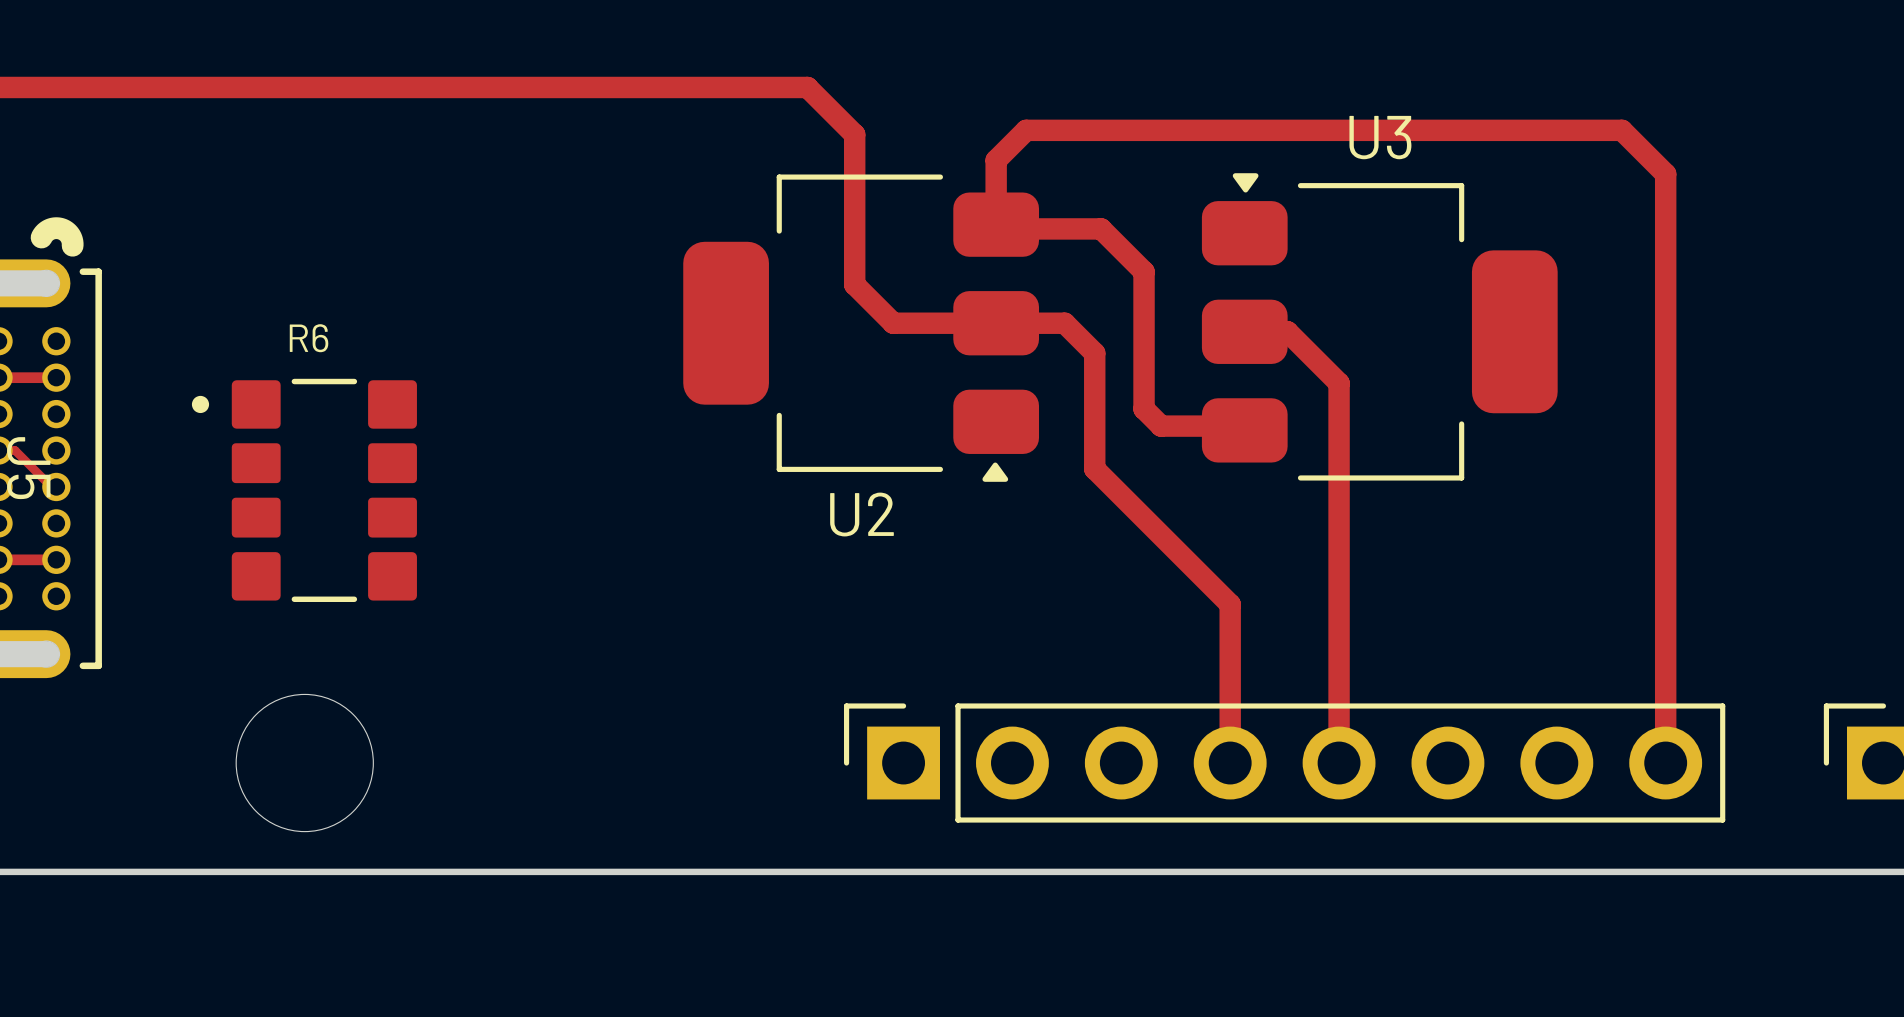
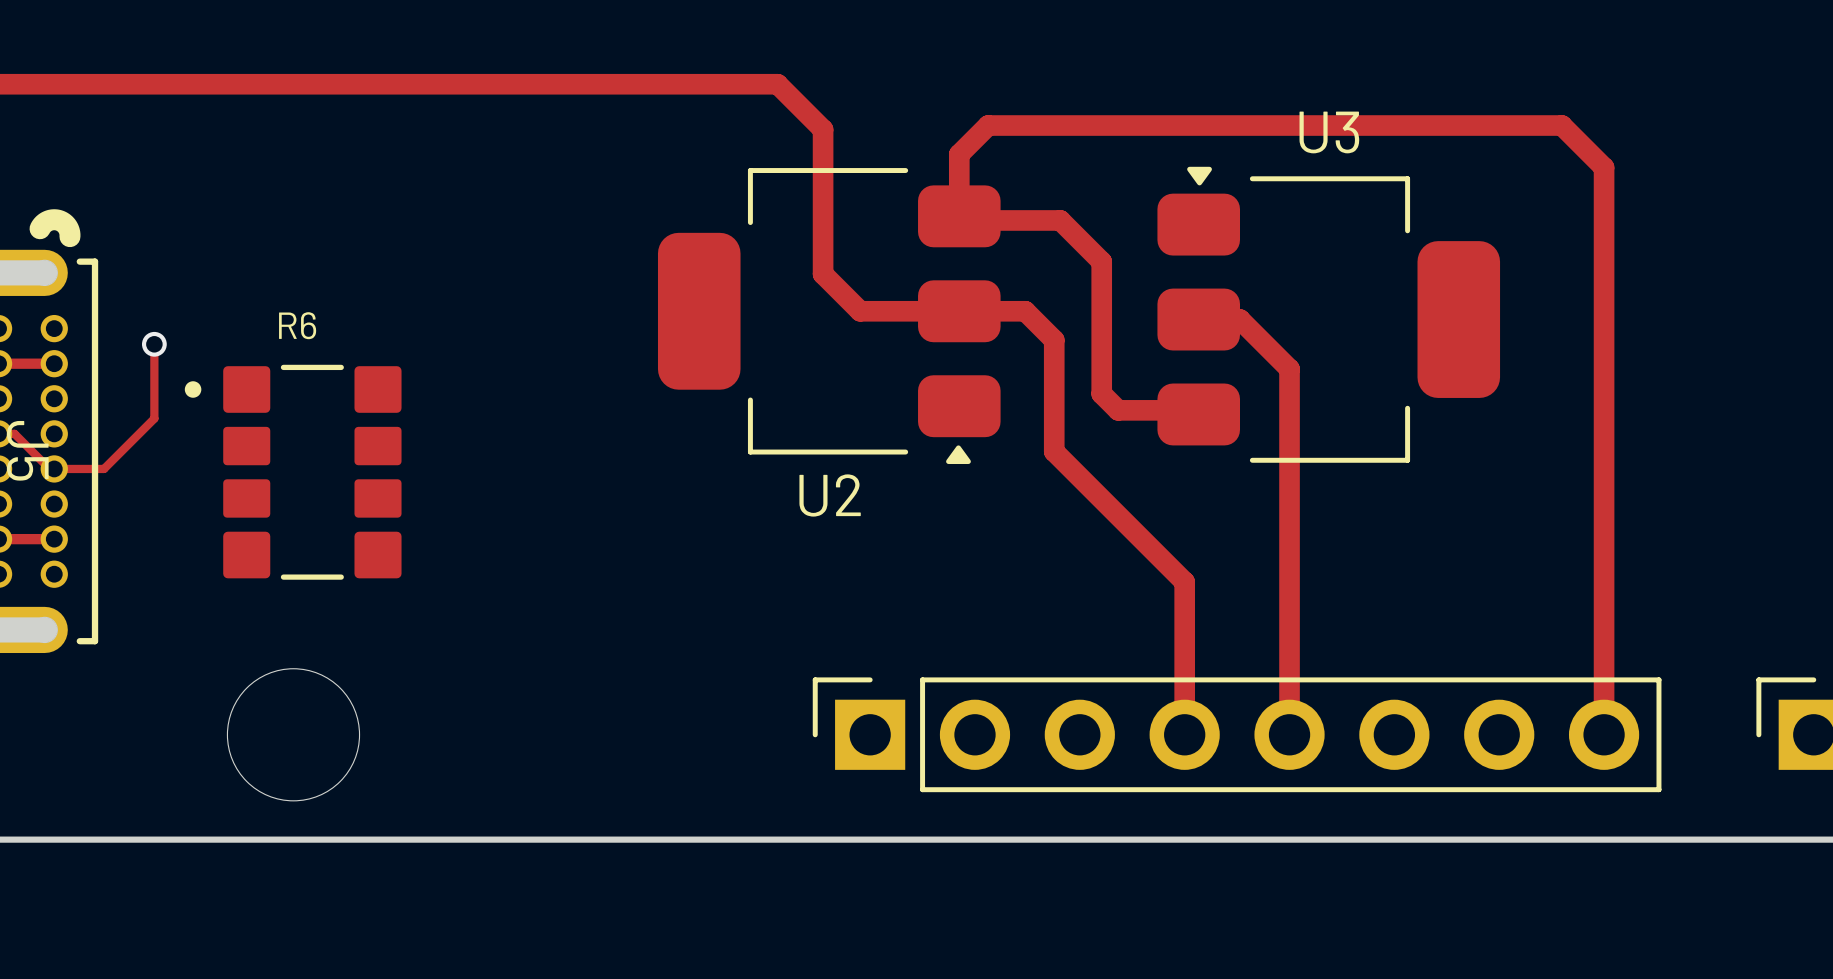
track: none -> (154, 344) (154, 418) (104, 468) (54, 468)
via: none -> (154, 344)

